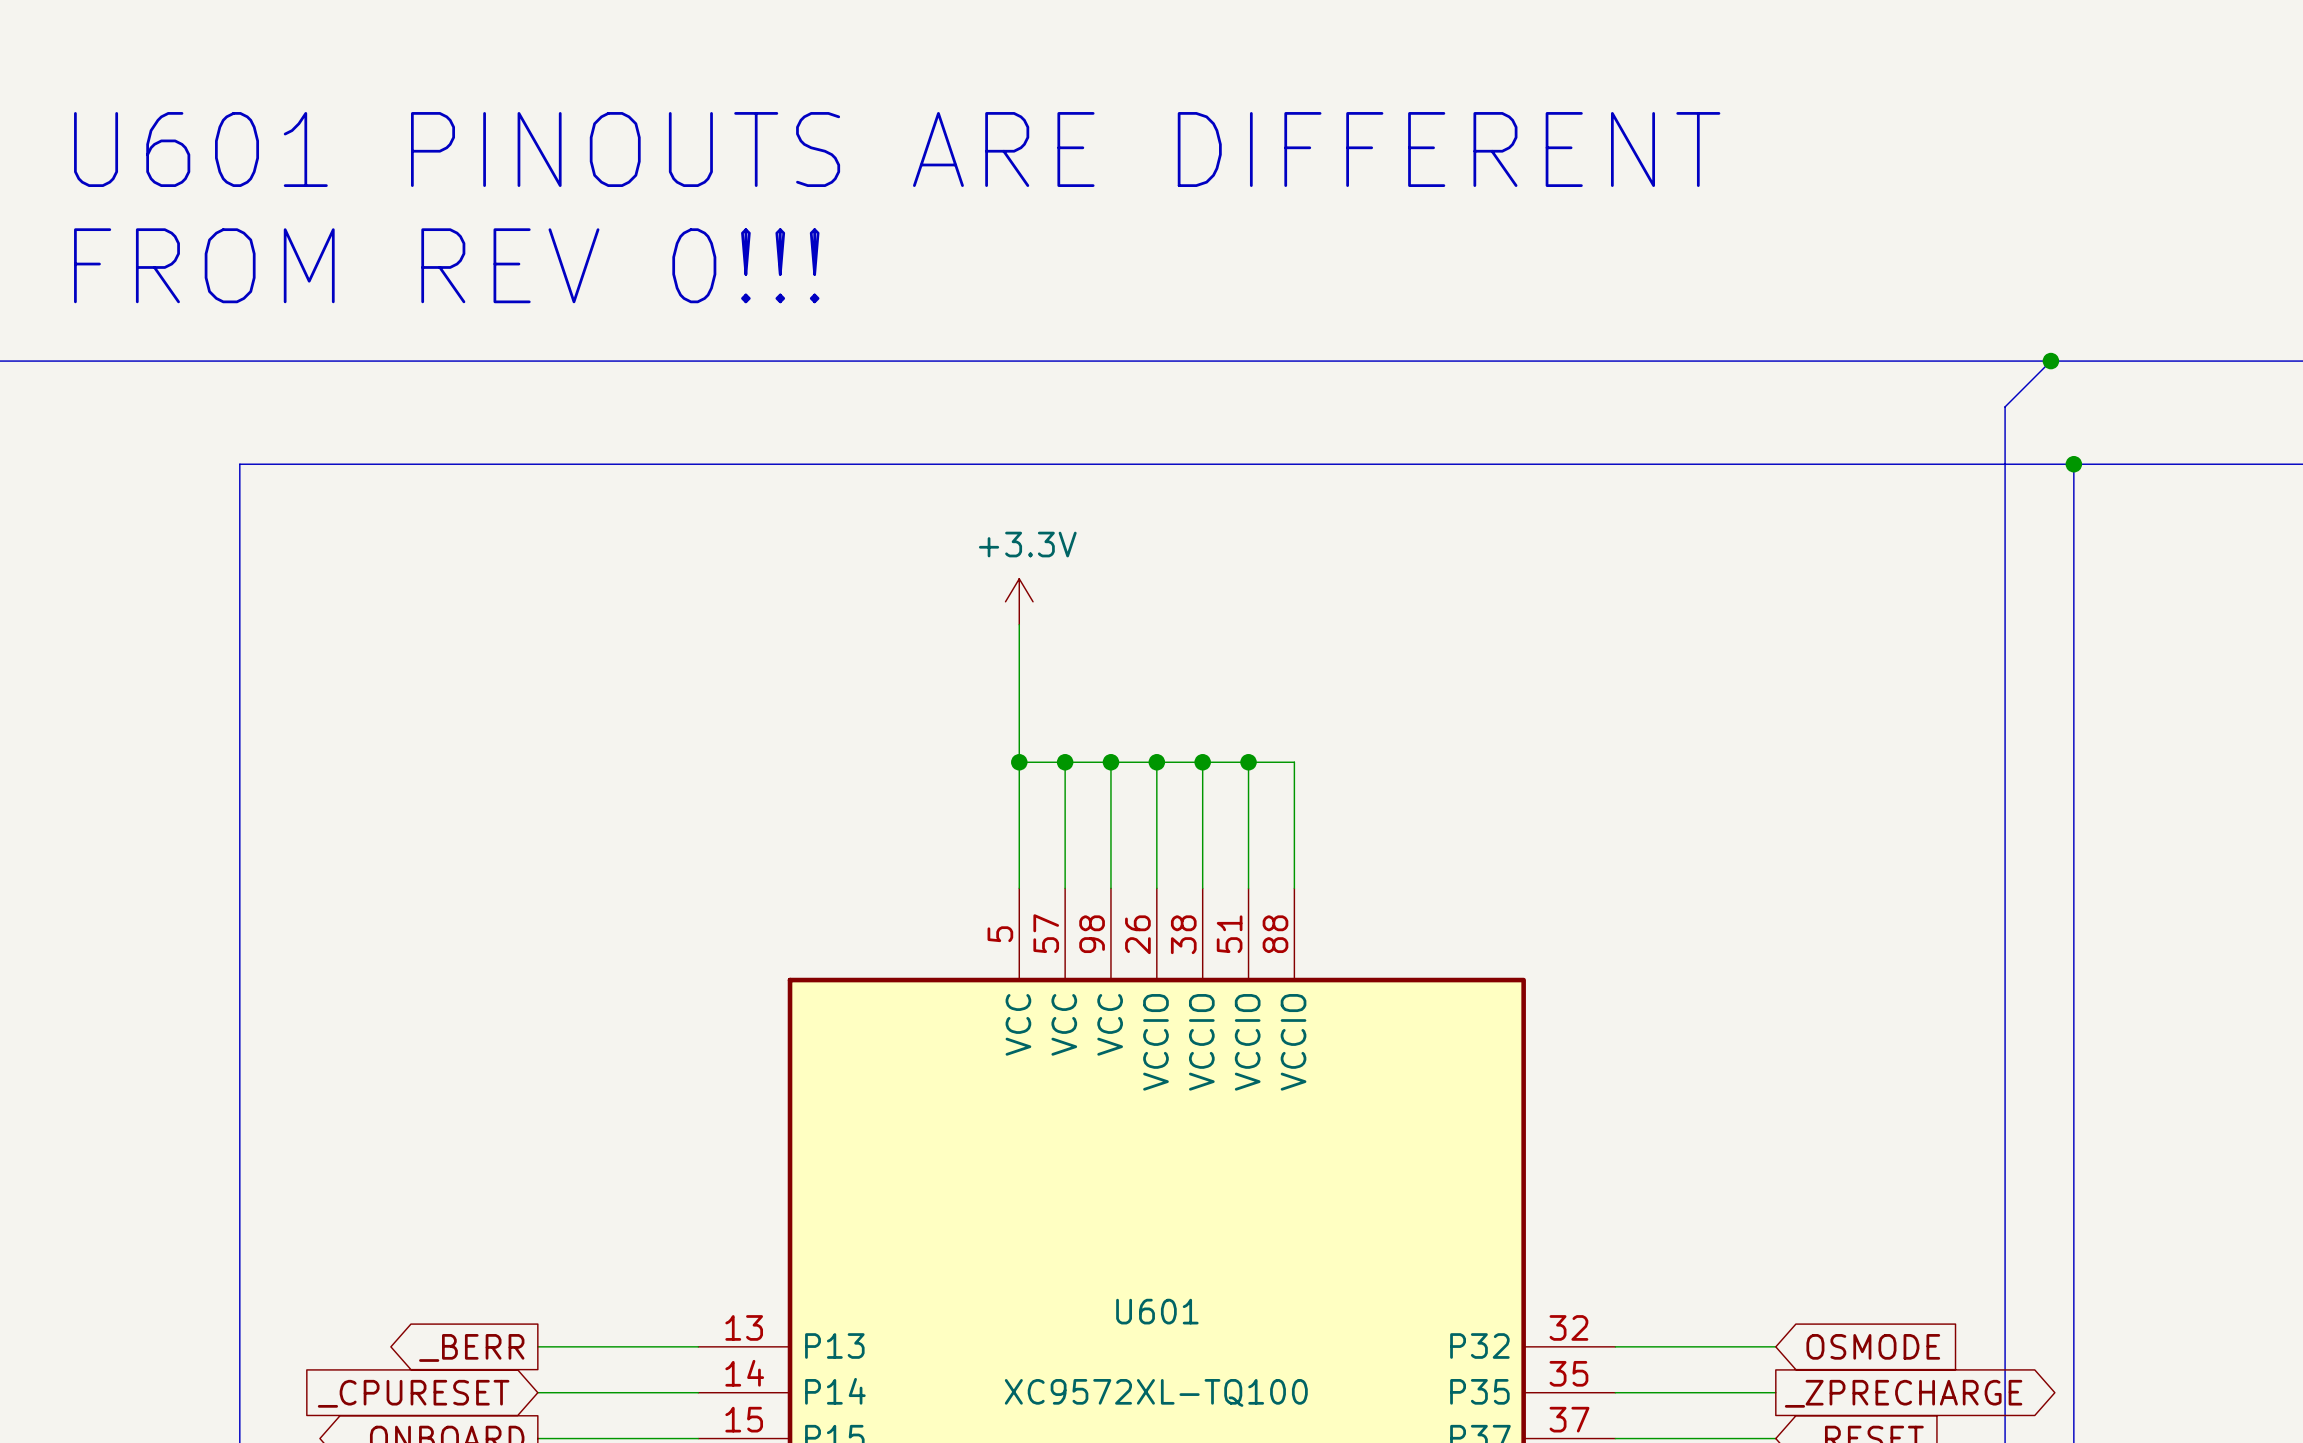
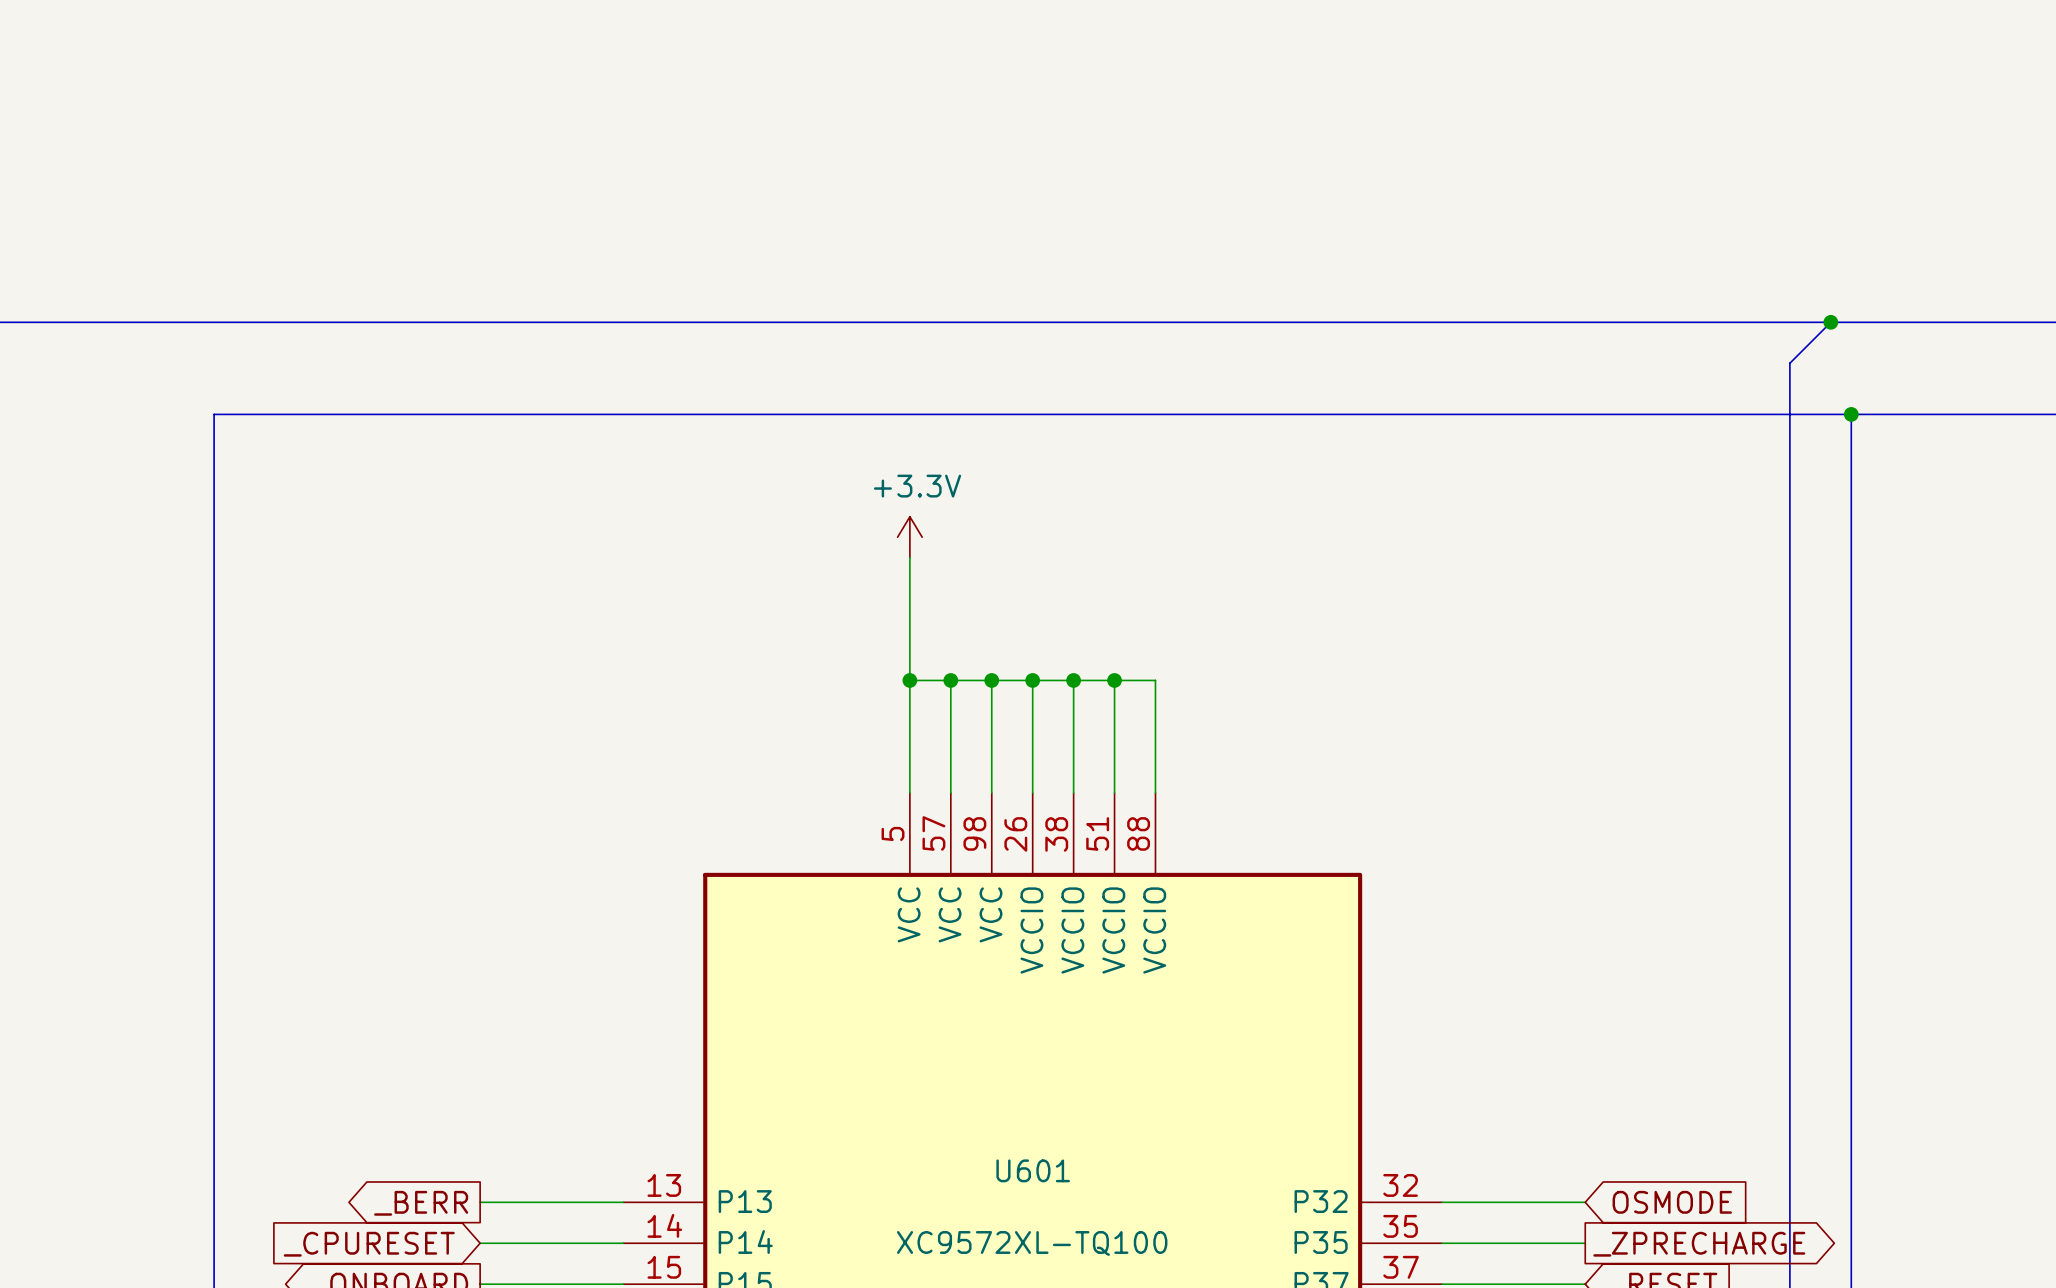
text: U601 PINOUTS ARE DIFFERENT (897, 149) -> none
text: FROM REV 0!!! (446, 265) -> none

